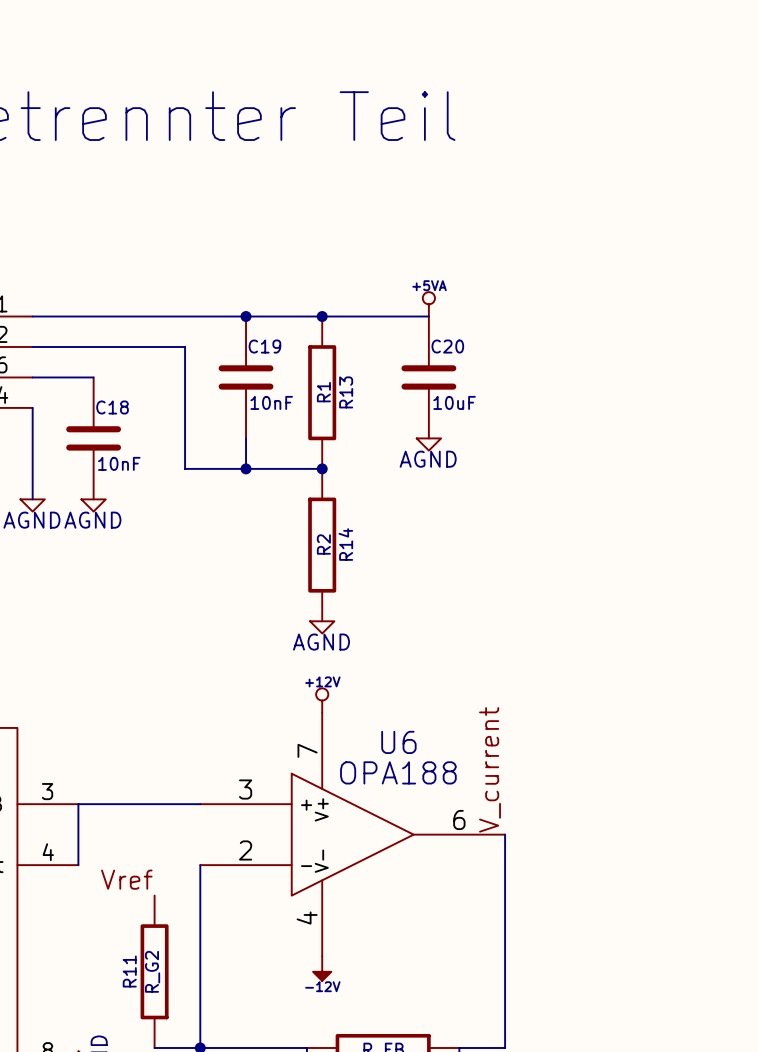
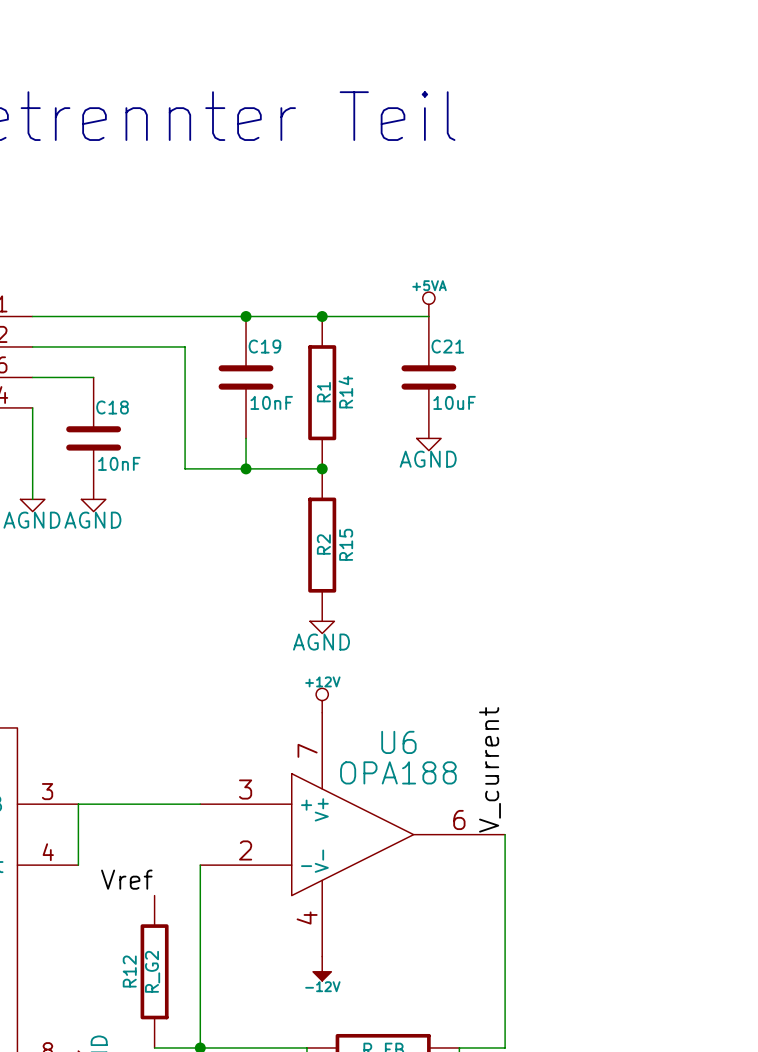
C20 name: C20 (447, 346) -> C21 (447, 346)
R13 name: R13 (346, 392) -> R14 (345, 392)
R14 name: R14 (345, 544) -> R15 (346, 544)
R11 name: R11 (129, 971) -> R12 (129, 971)

